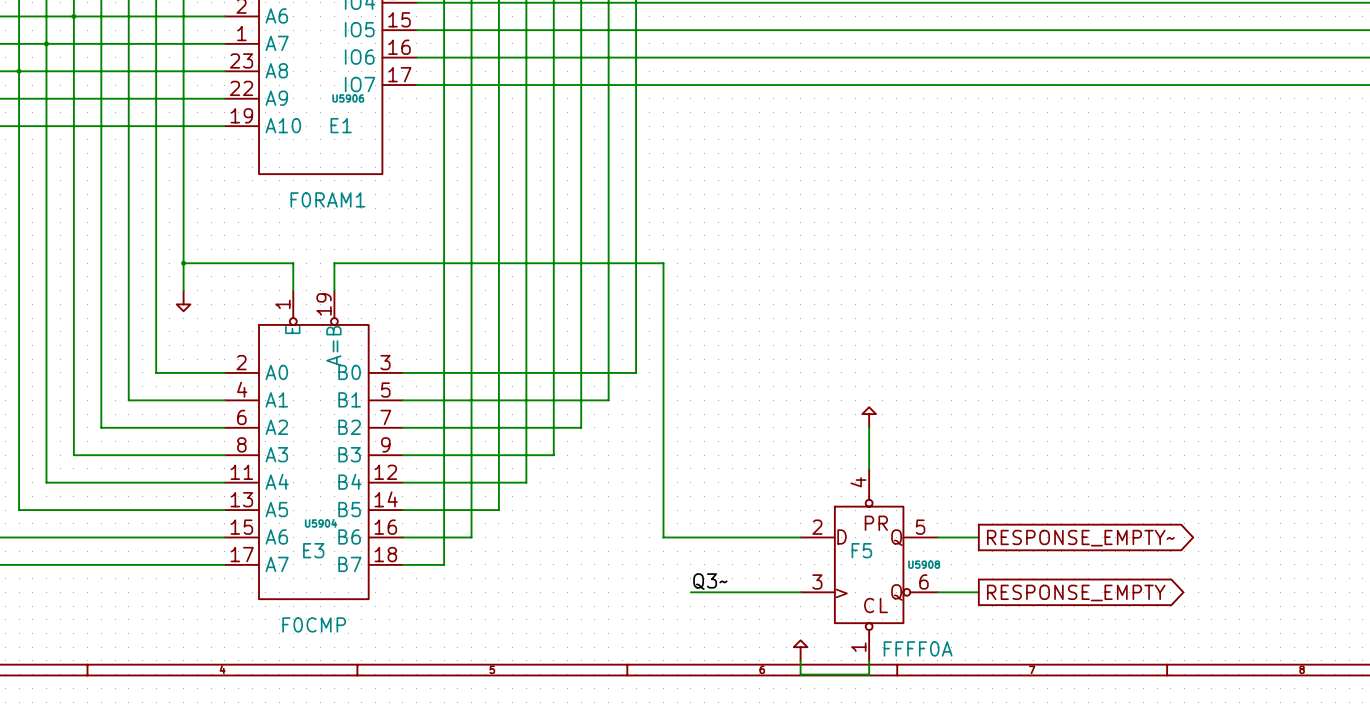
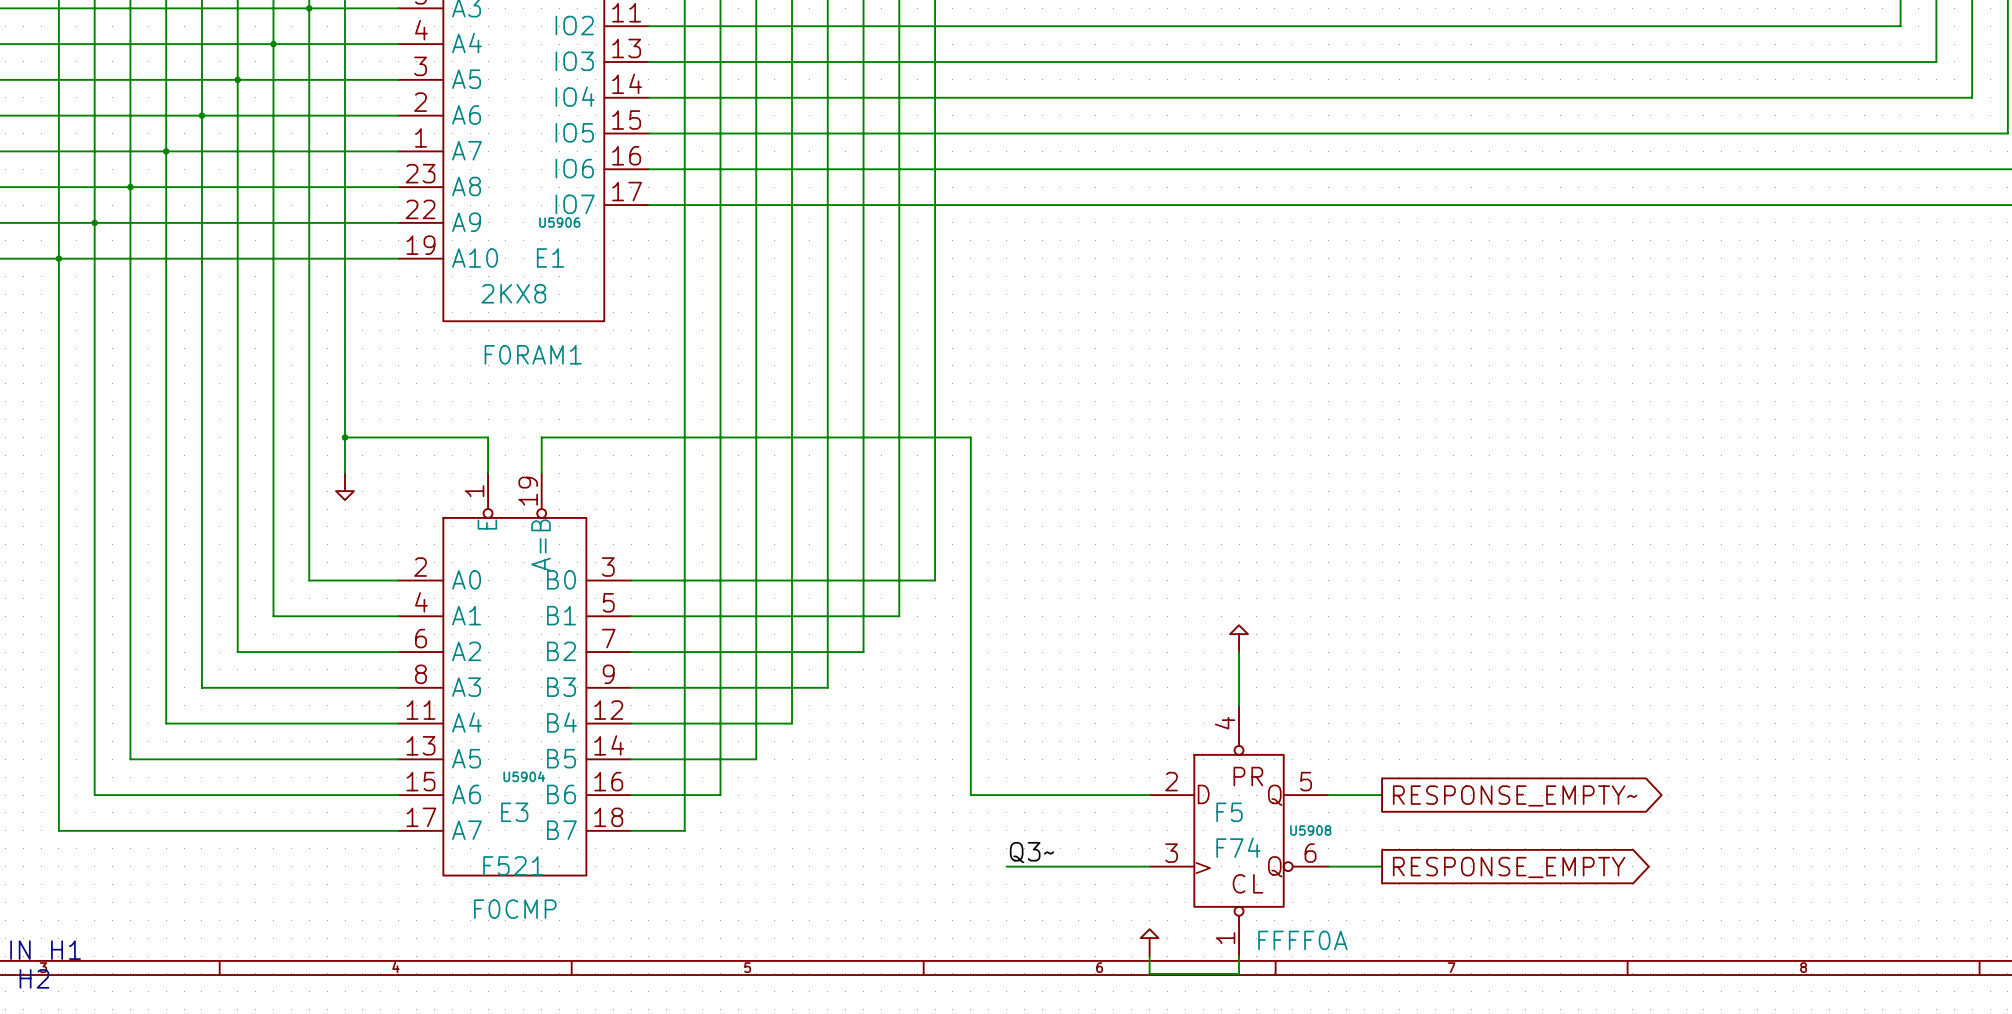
U5906 value: none -> 2KX8 (513, 293)
U5908 value: none -> F74 (1238, 847)
U5904 value: none -> F521 (513, 865)

